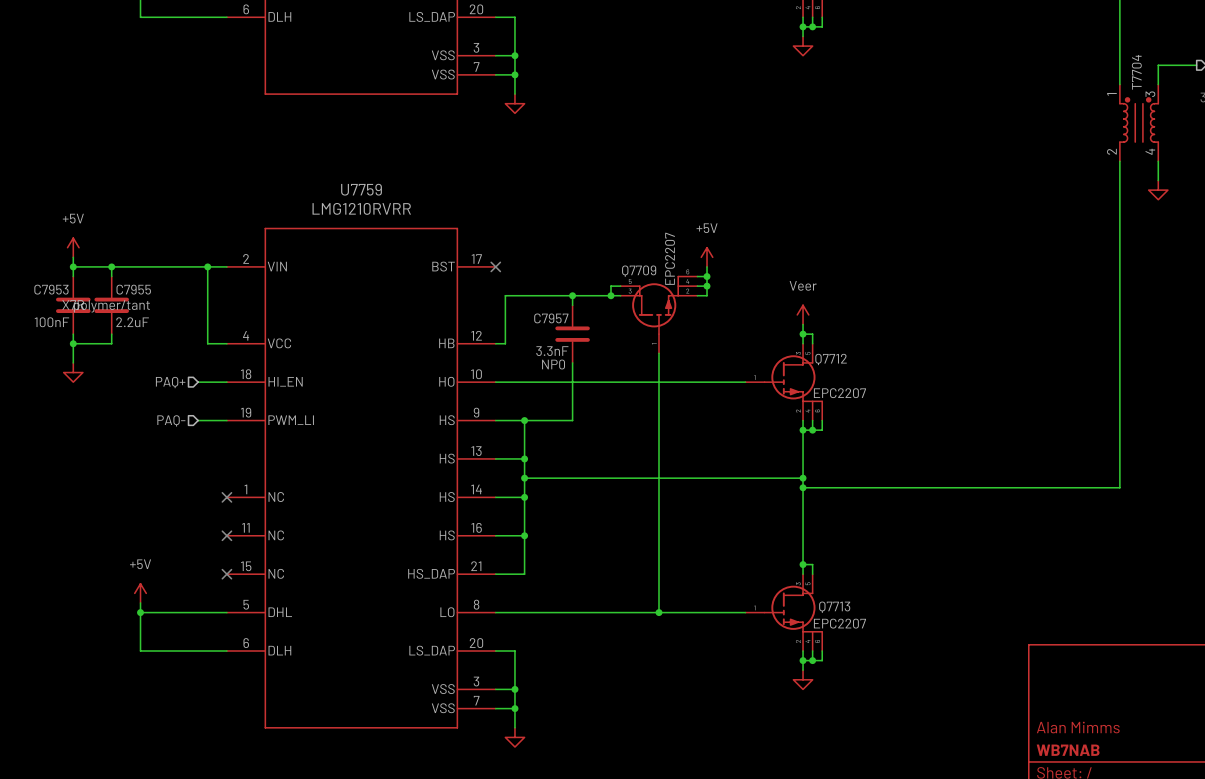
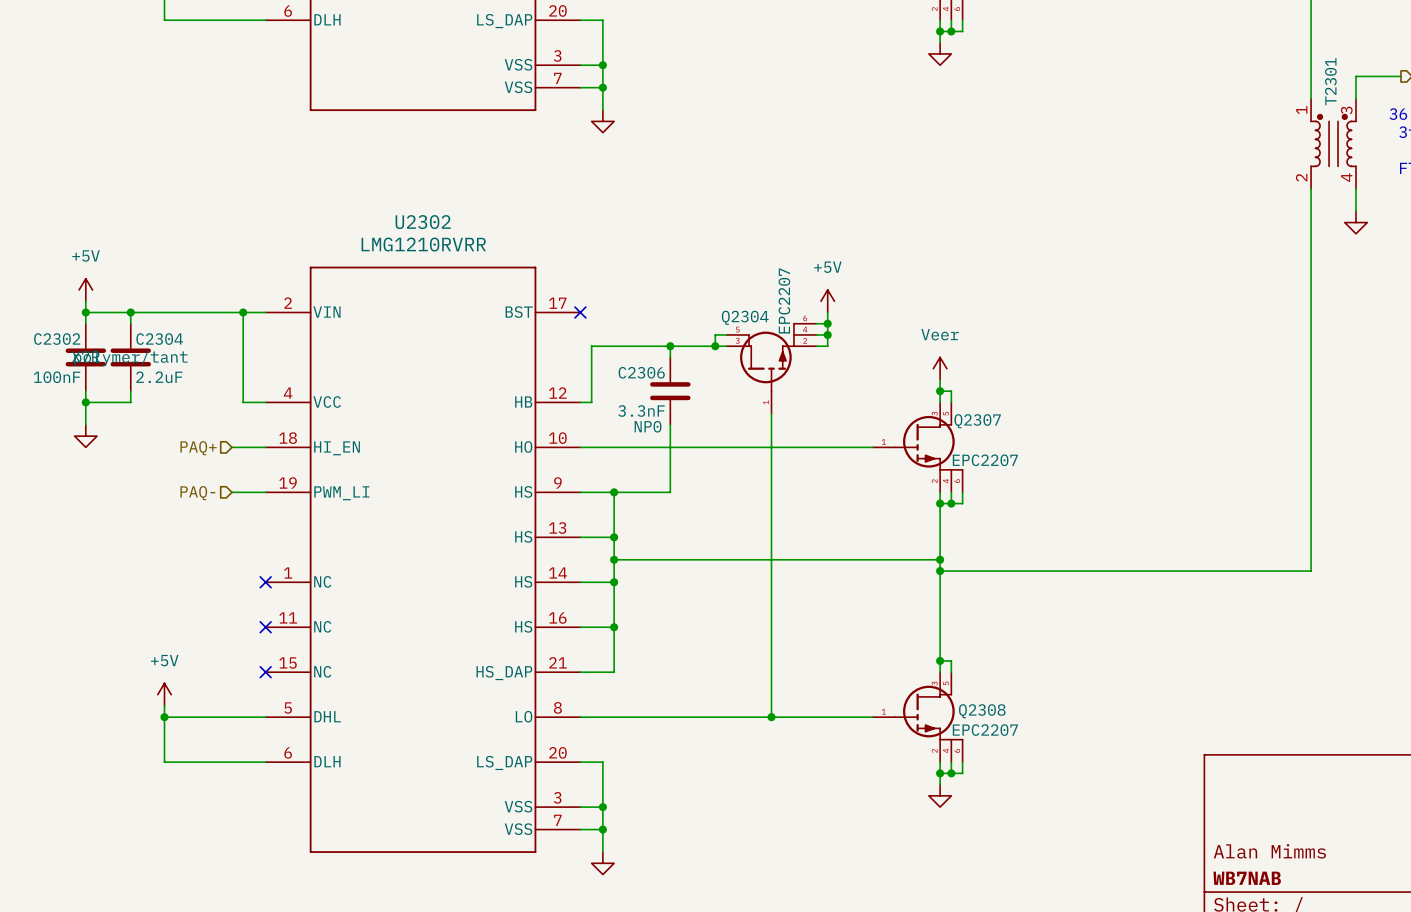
T7704 name: T7704 (1136, 72) -> T2301 (1330, 81)
U7759 name: U7759 (361, 189) -> U2302 (423, 222)
Q7709 name: Q7709 (639, 271) -> Q2304 (745, 317)
C7953 name: C7953 (51, 289) -> C2302 (57, 339)
C7955 name: C7955 (133, 289) -> C2304 (159, 339)
C7957 name: C7957 (551, 318) -> C2306 (641, 372)
Q7712 name: Q7712 (831, 359) -> Q2307 (977, 421)
Q7713 name: Q7713 (834, 607) -> Q2308 (982, 711)

